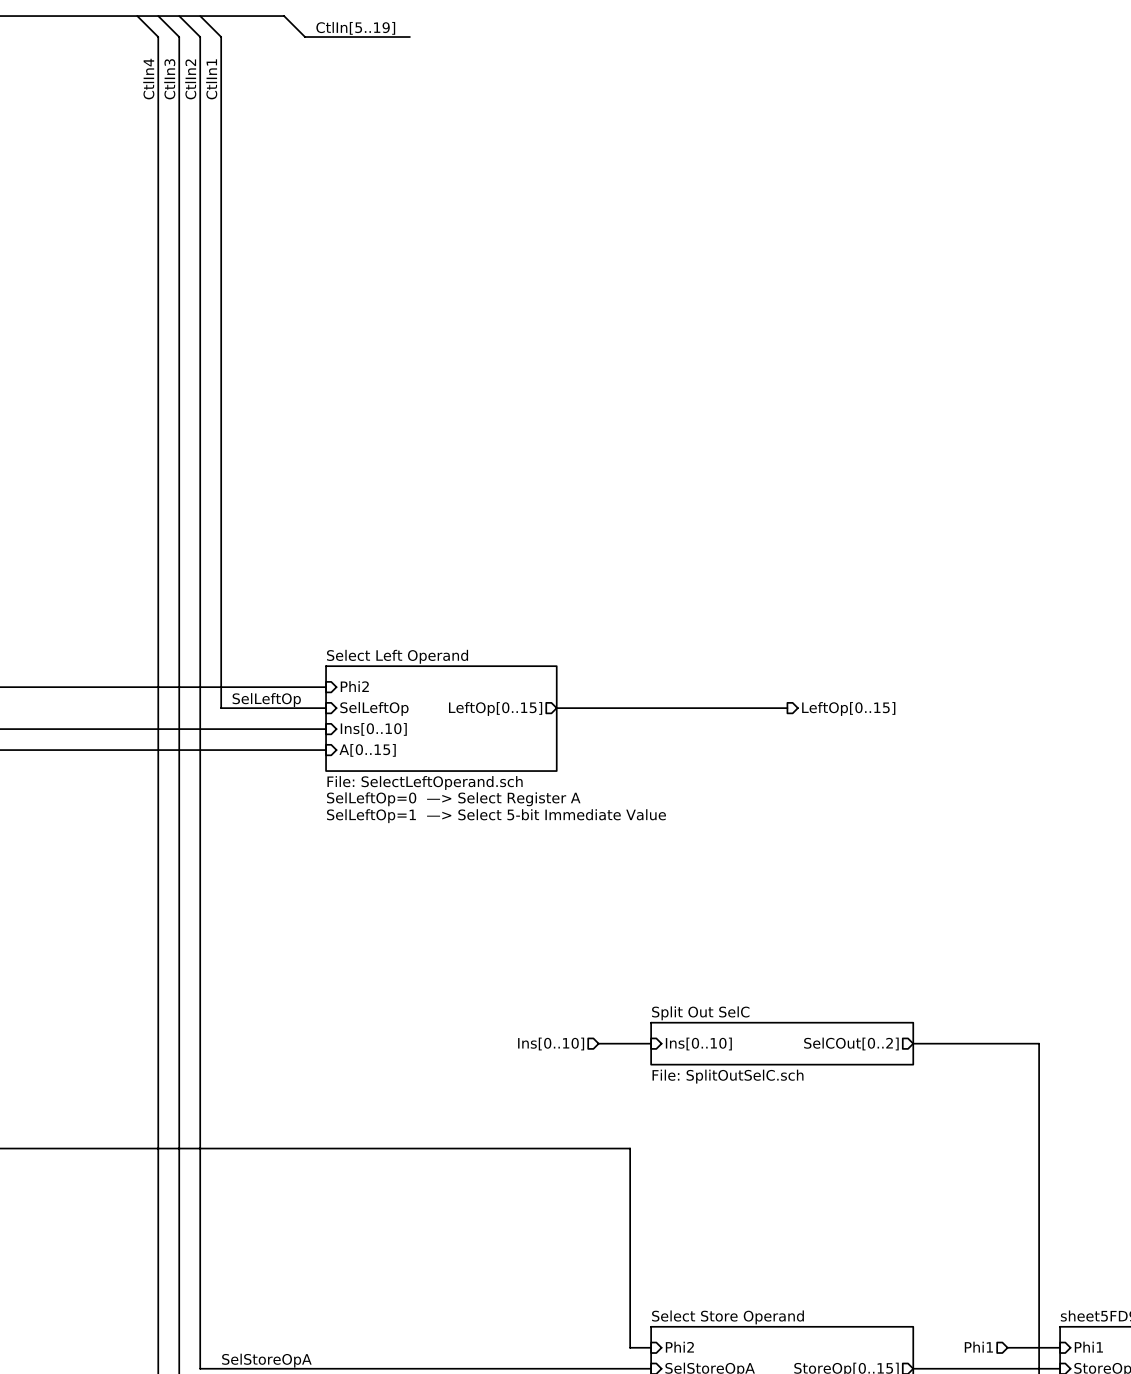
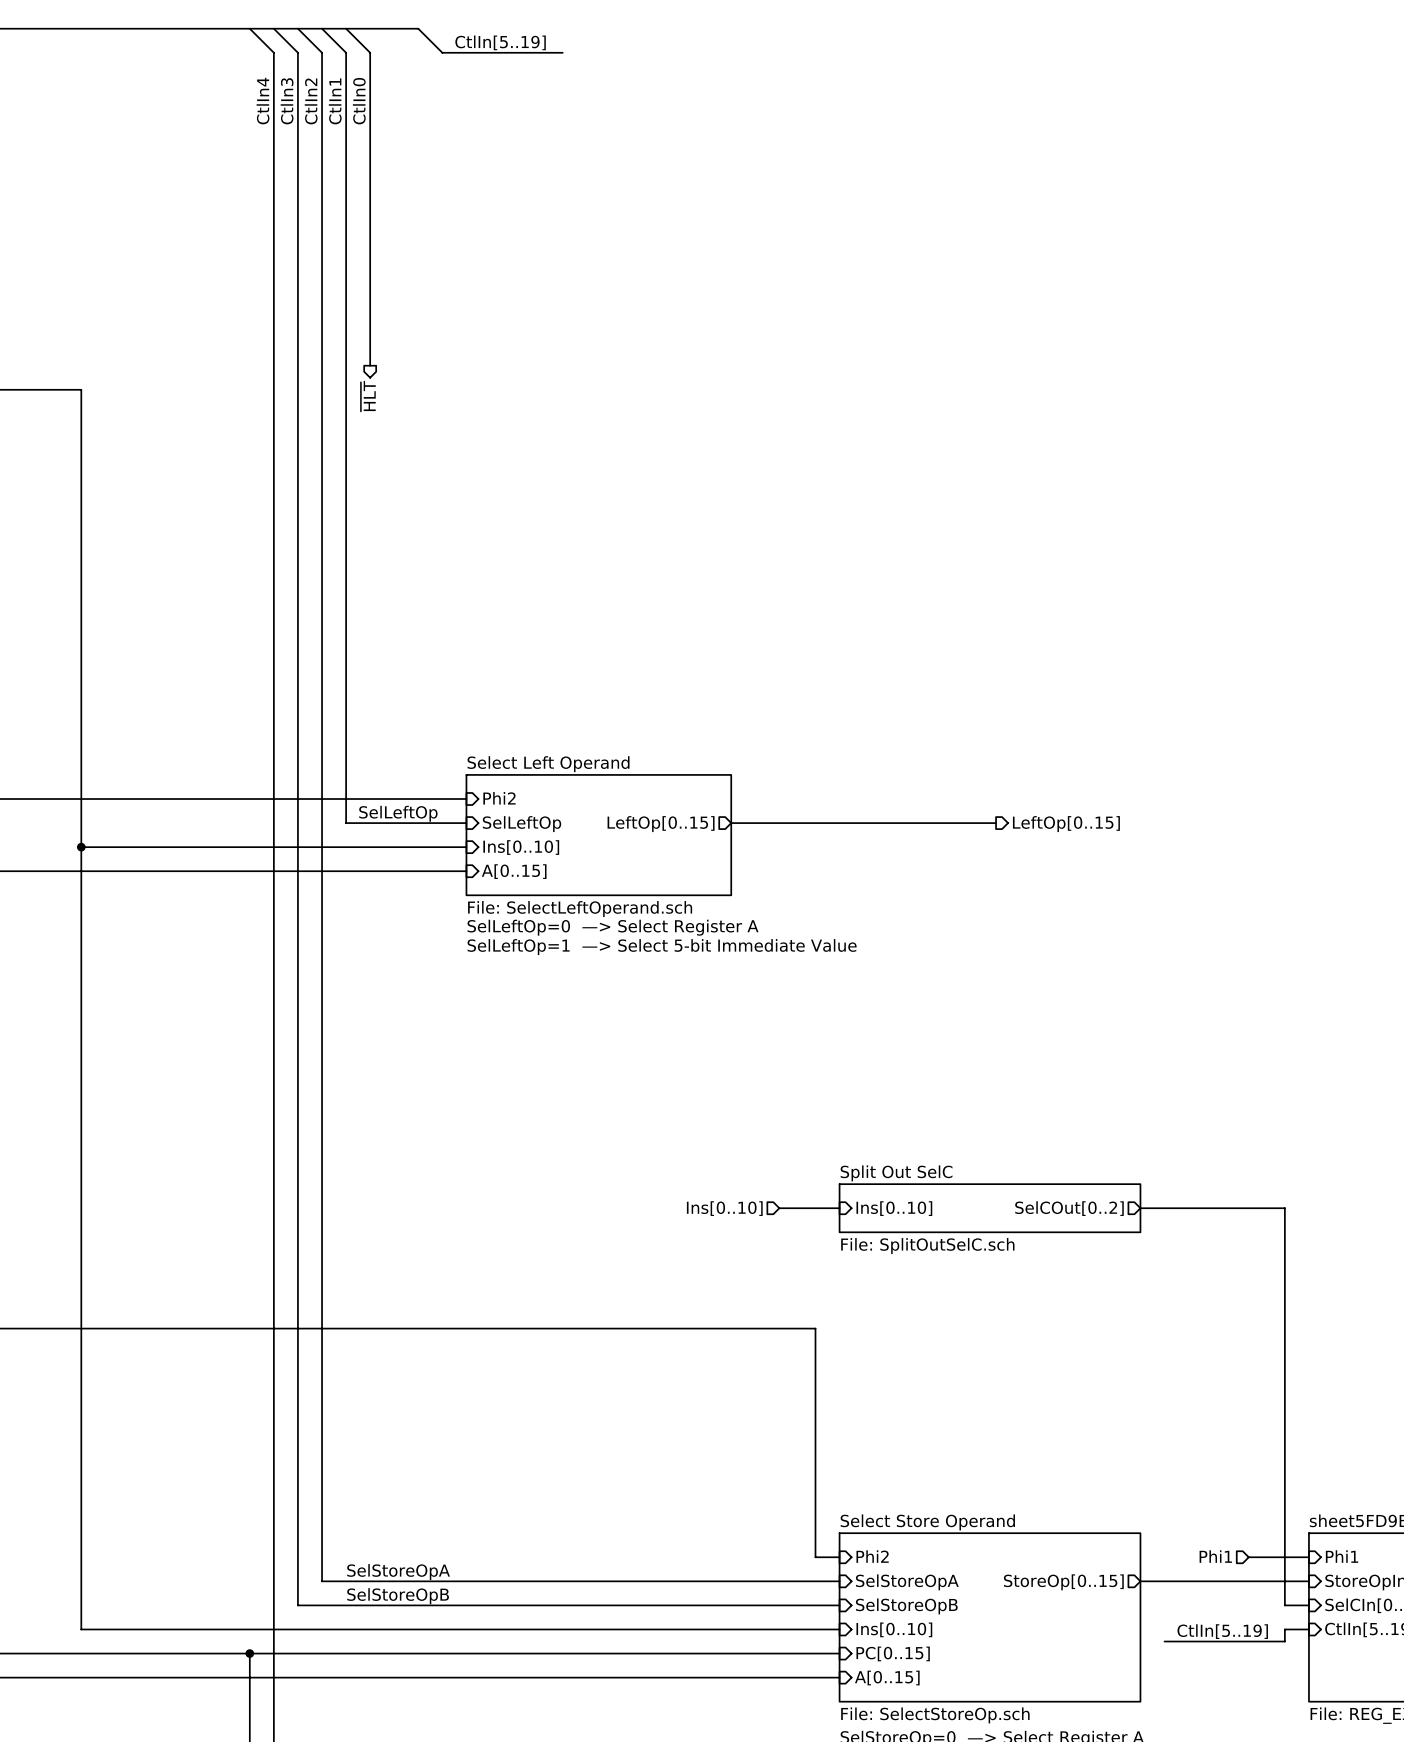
wire: none -> (346, 28) (370, 52) (370, 365)
label: none -> CtlIn0 (359, 101)
hierarchical label: none -> ~{HLT} (368, 396)

